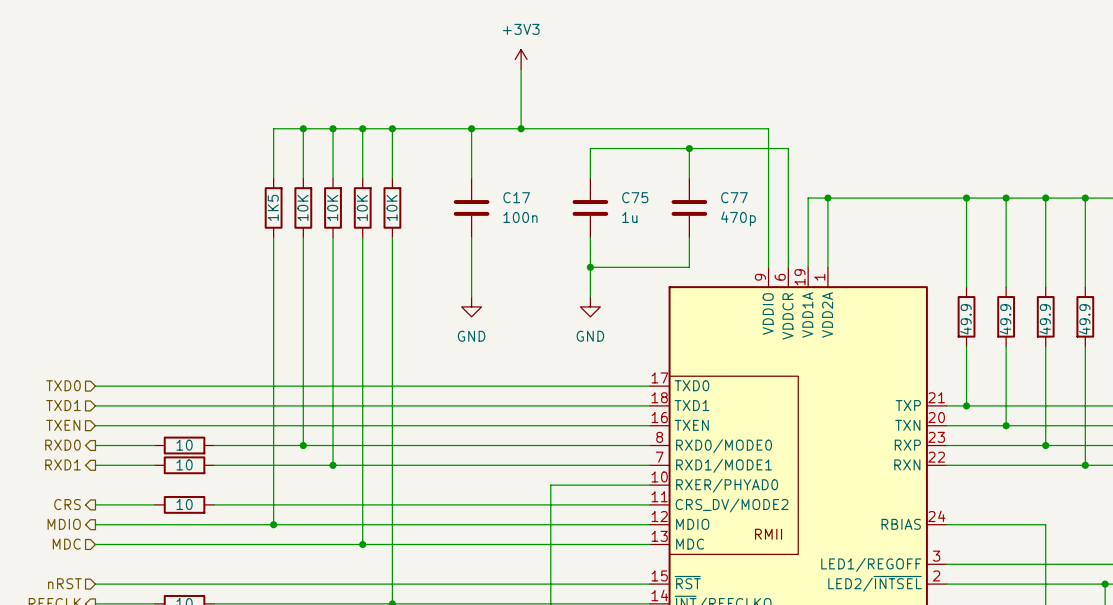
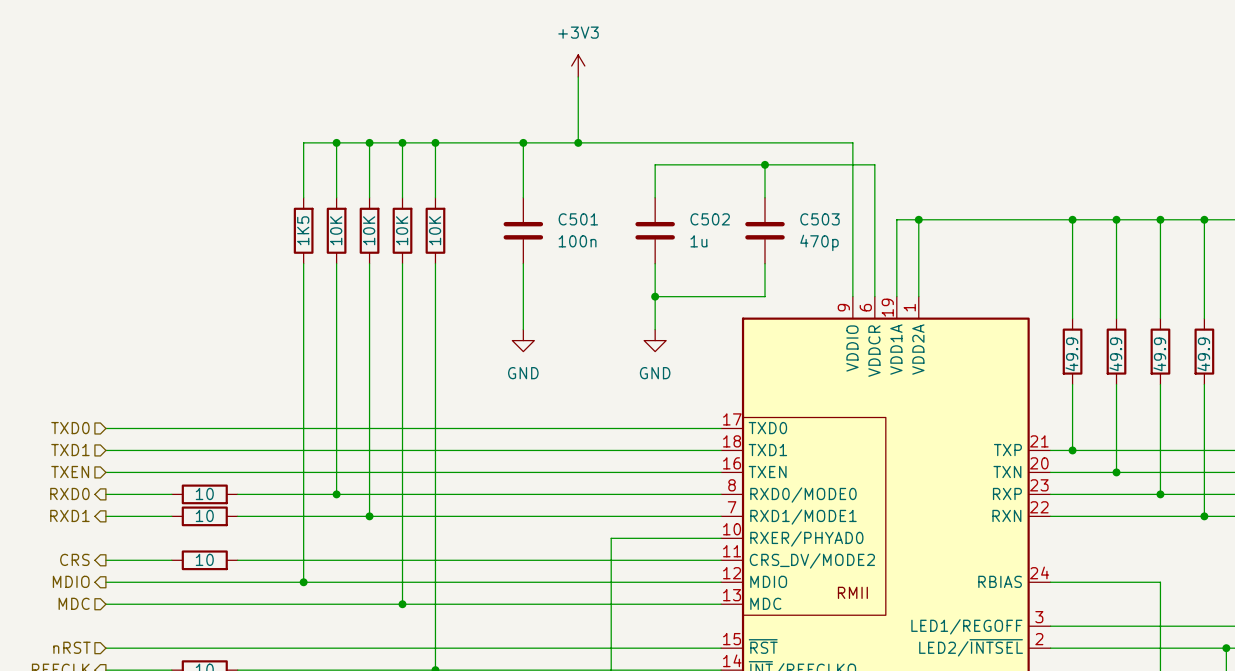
C17 name: C17 (516, 197) -> C501 (578, 219)
C75 name: C75 (635, 197) -> C502 (710, 219)
C77 name: C77 (734, 197) -> C503 (820, 219)

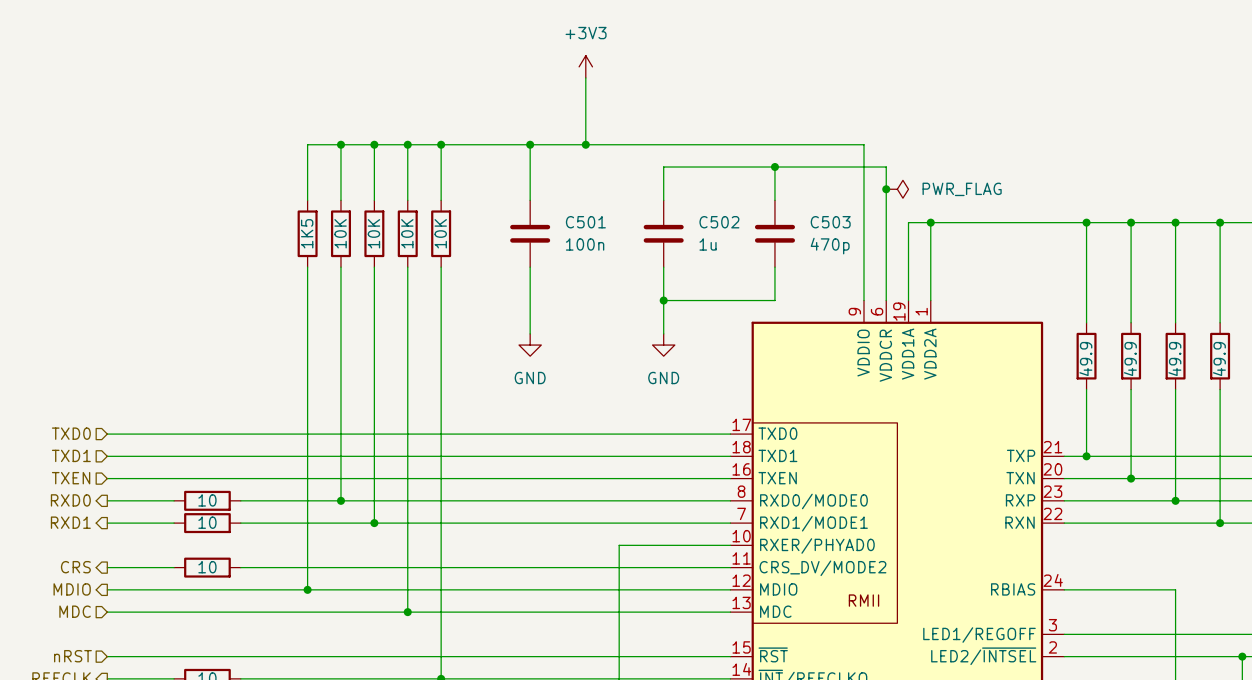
junction: none -> (886, 189)
power symbol: none -> PWR_FLAG (897, 189)

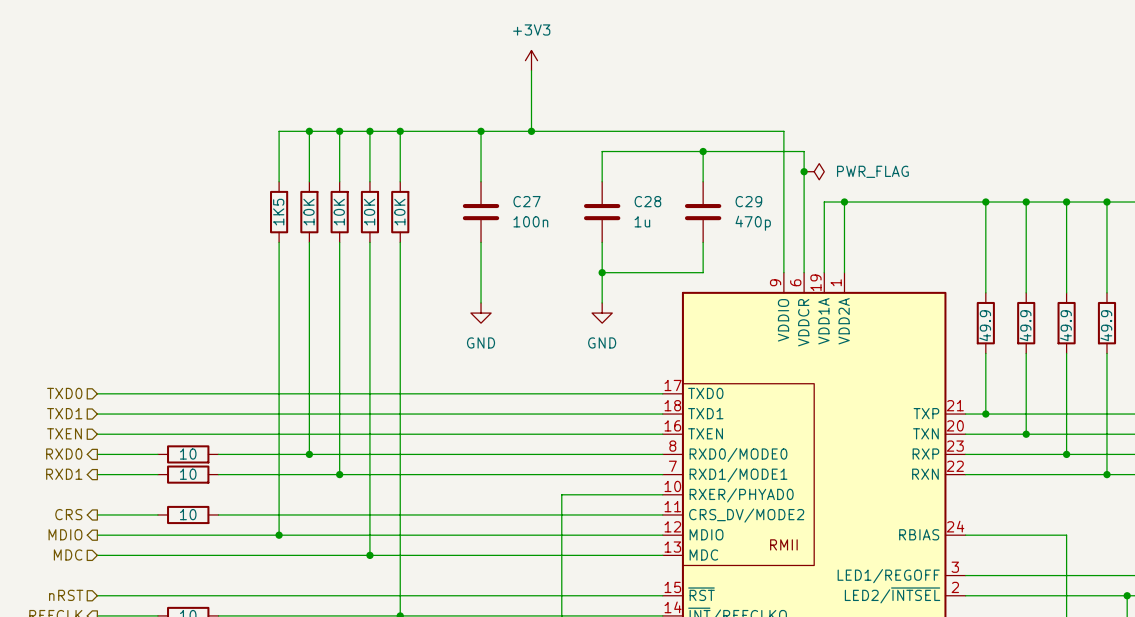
C501 name: C501 (585, 222) -> C27 (527, 201)
C502 name: C502 (719, 222) -> C28 (647, 201)
C503 name: C503 (830, 222) -> C29 (748, 201)

